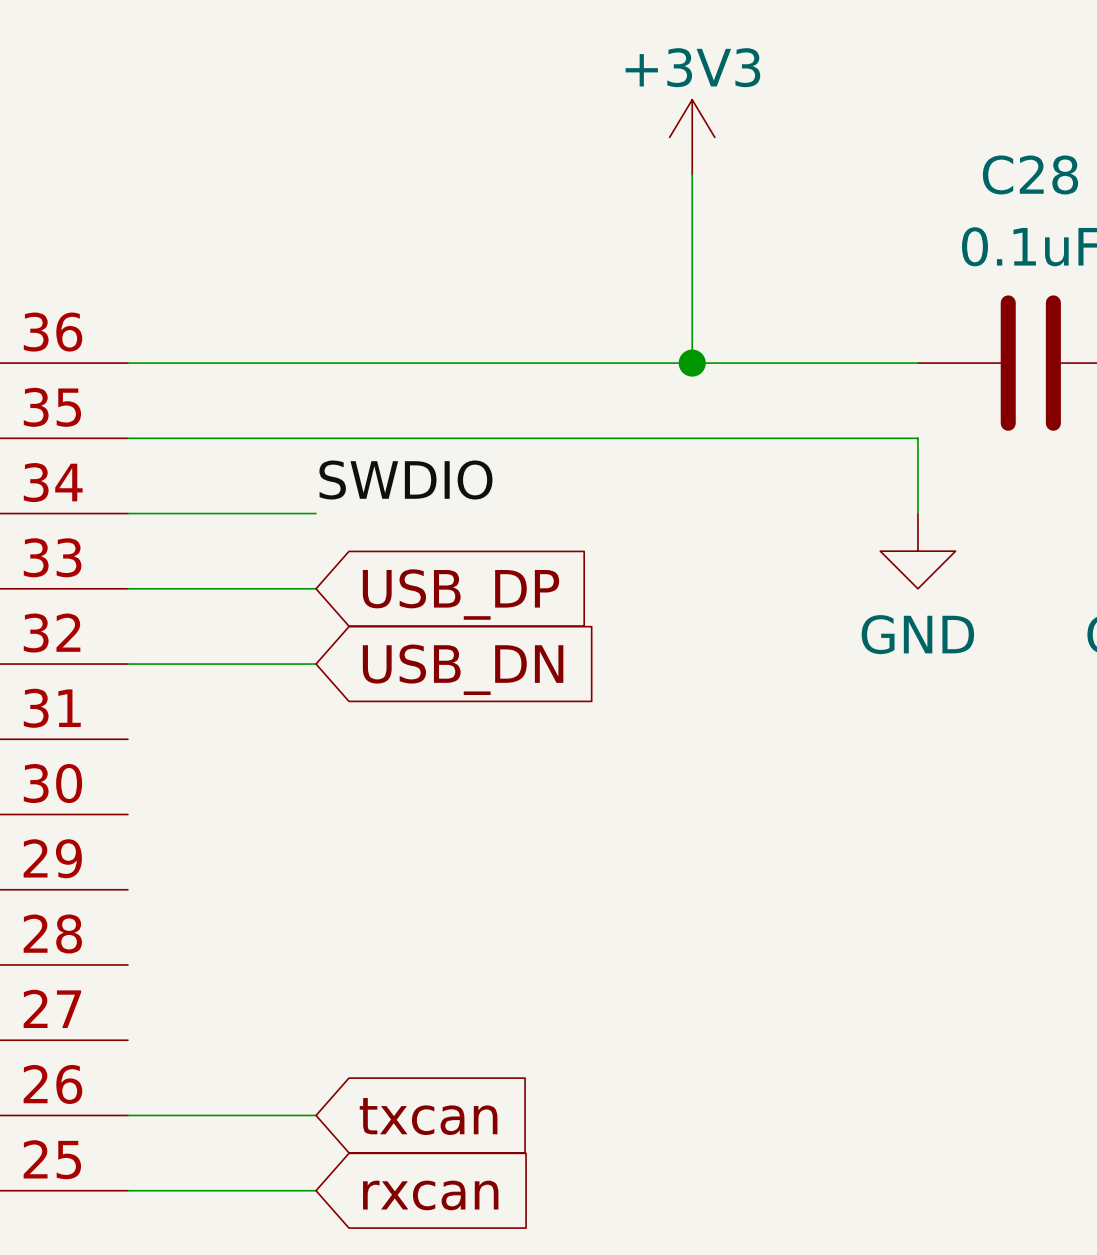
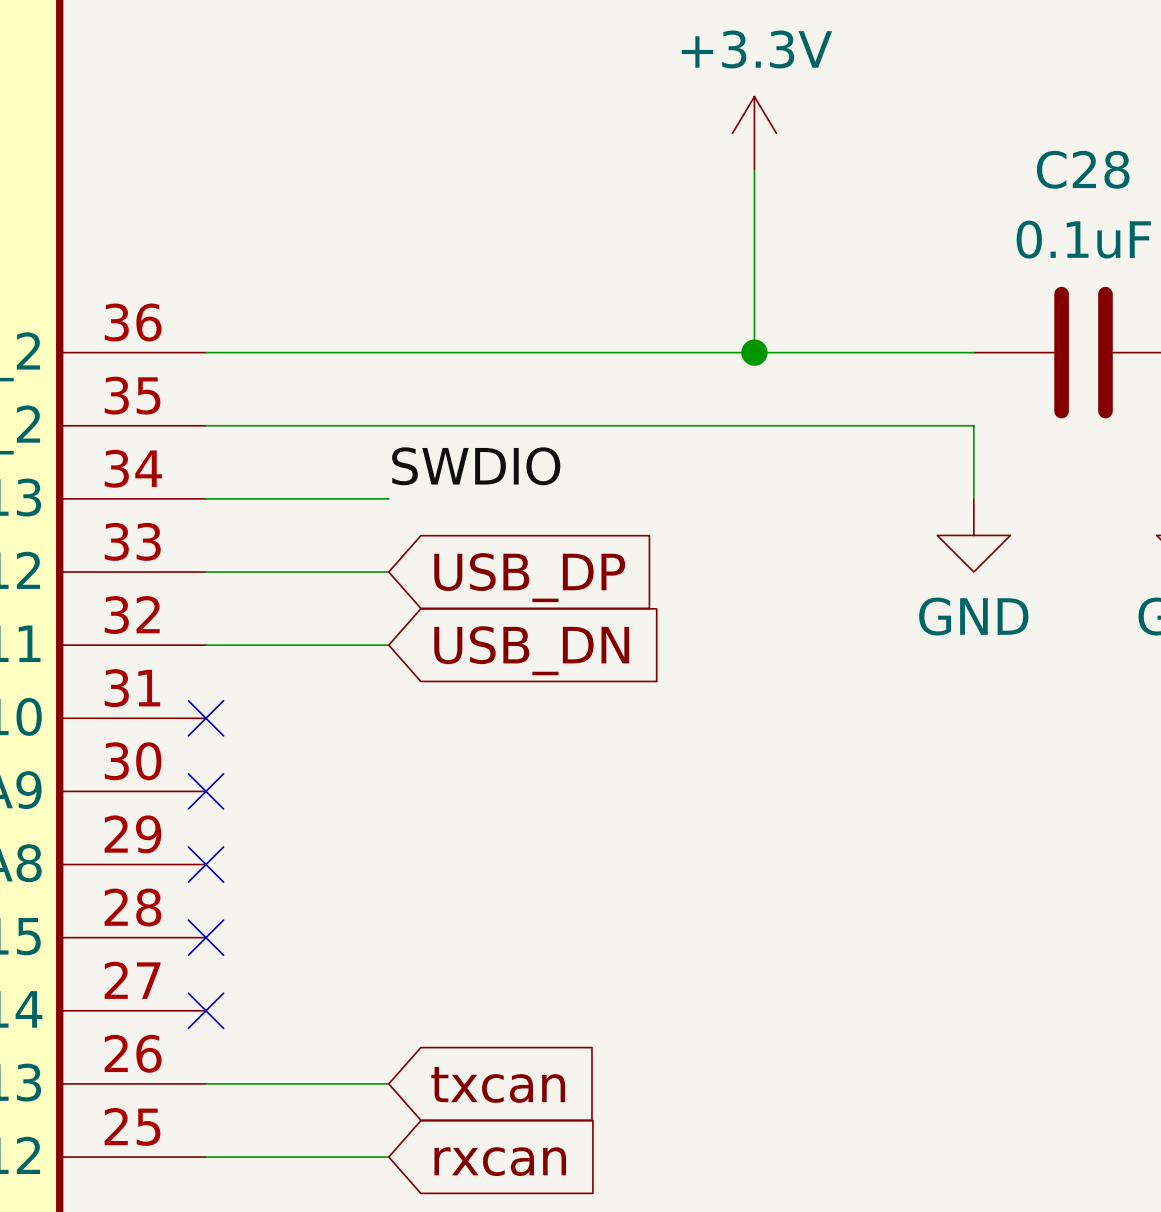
power symbol: +3V3 (692, 137) -> +3.3V (754, 133)
no-connect mark: none -> (205, 718)
no-connect mark: none -> (205, 791)
no-connect mark: none -> (205, 864)
no-connect mark: none -> (205, 937)
no-connect mark: none -> (205, 1010)

